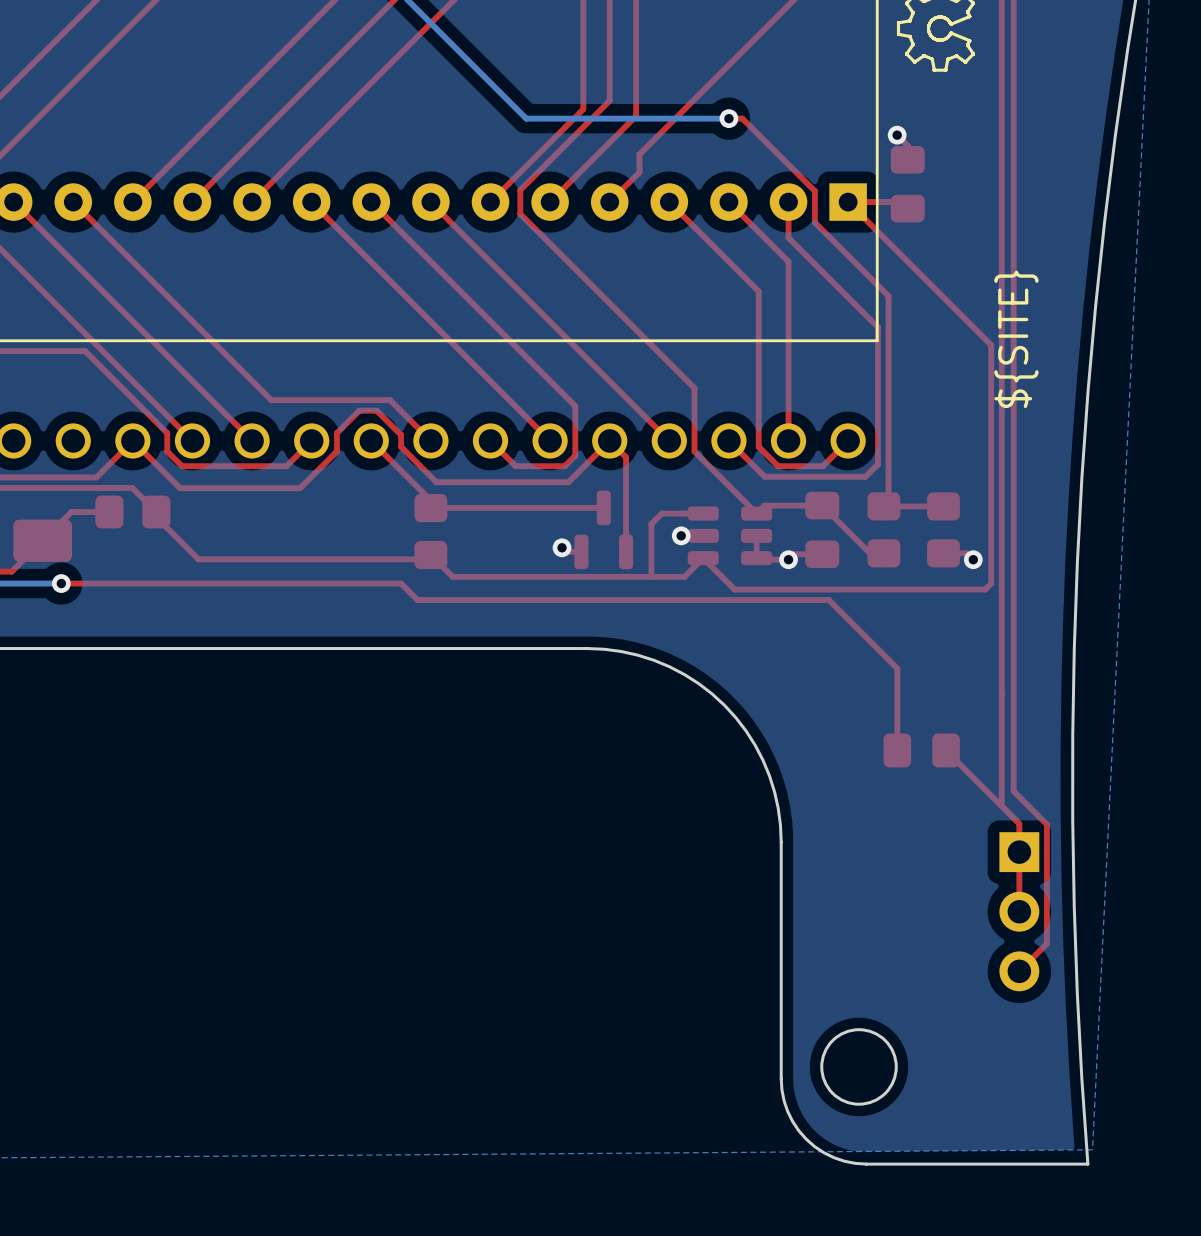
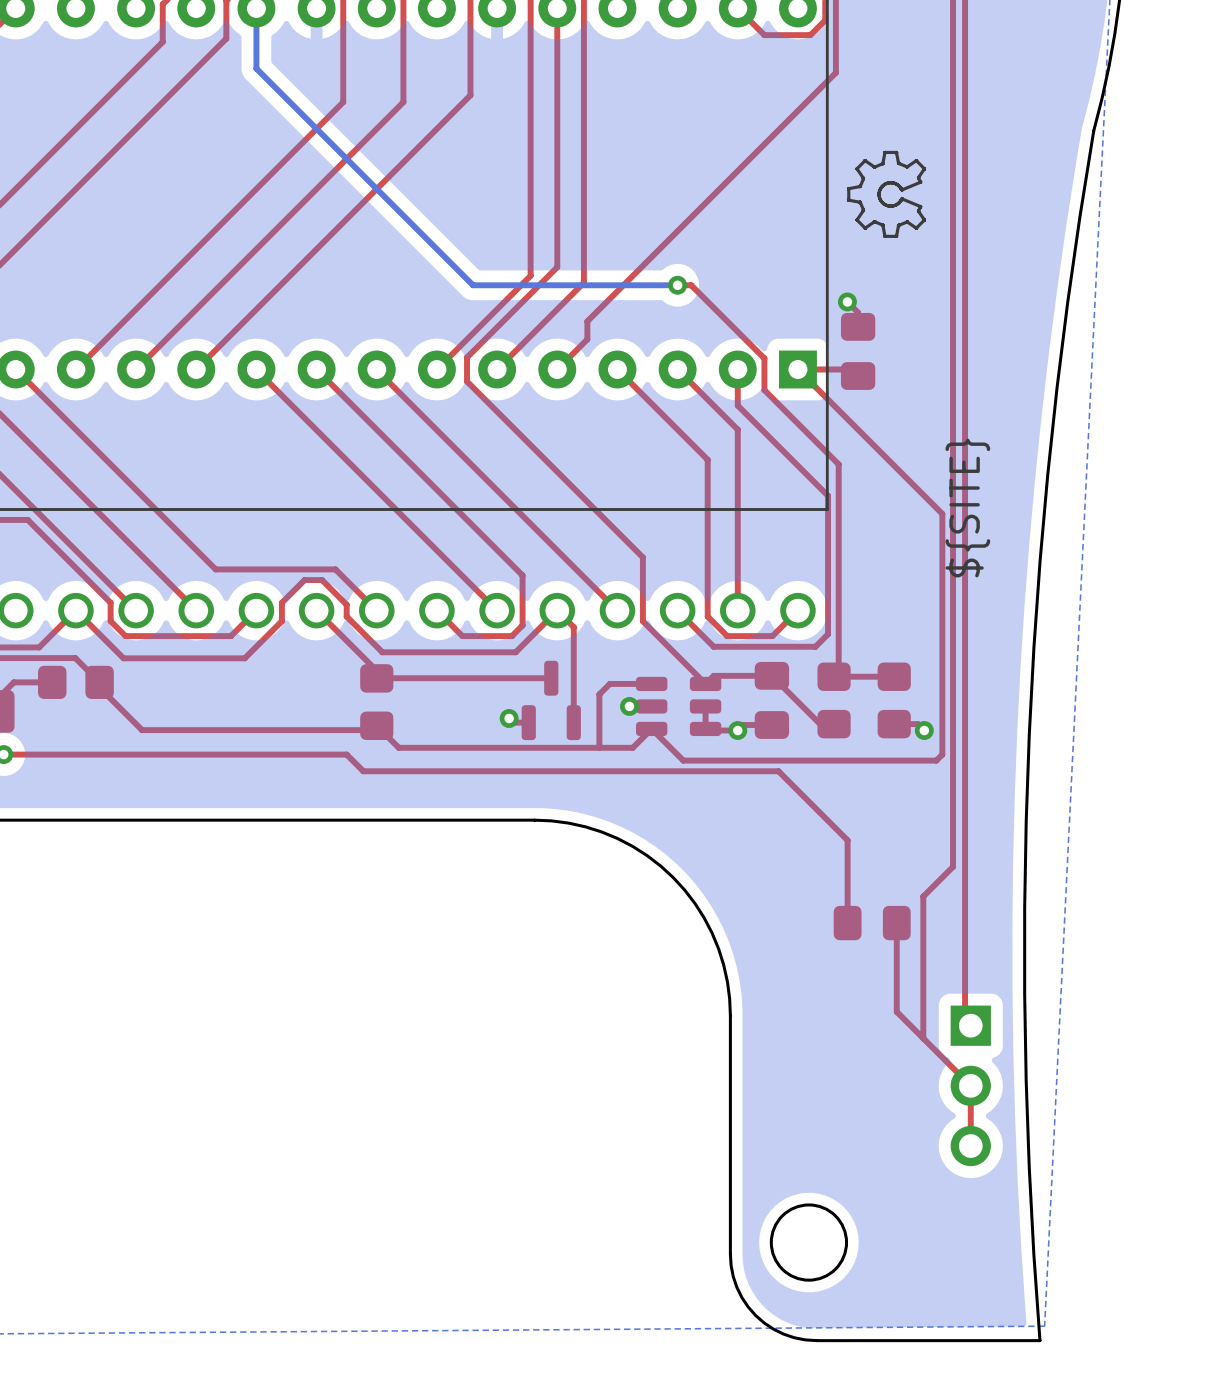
top track: (1001, 694) (1001, 806) -> (953, 866) (923, 896) (923, 1038)
top track: (946, 750) (1019, 823) (1019, 911) -> (896, 923) (896, 1011) (970, 1085) (970, 1146)
top track: (1013, 791) (1046, 824) (1046, 943) (1019, 971) -> (965, 964) (965, 1019)

